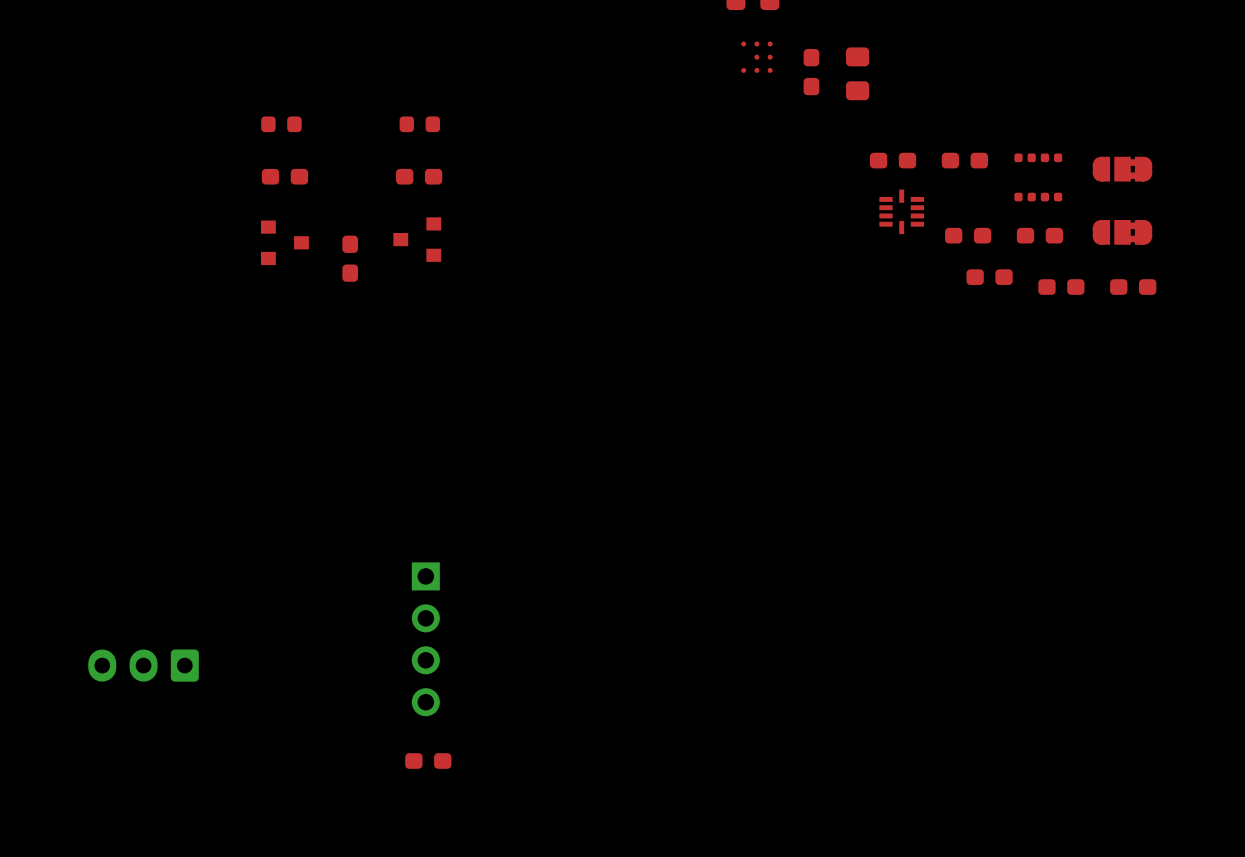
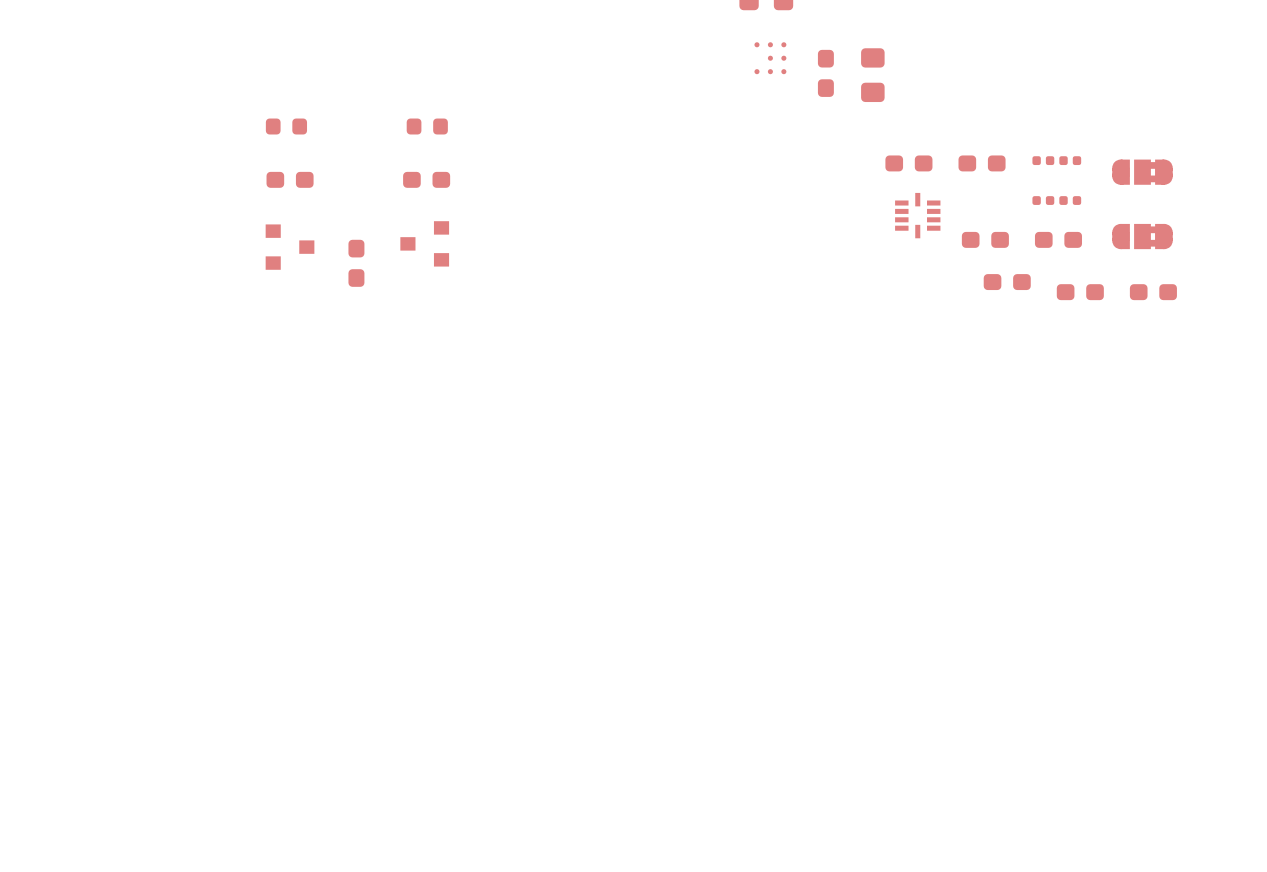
part: (425, 639) -> none
part: (143, 665) -> none
part: (428, 760) -> none

